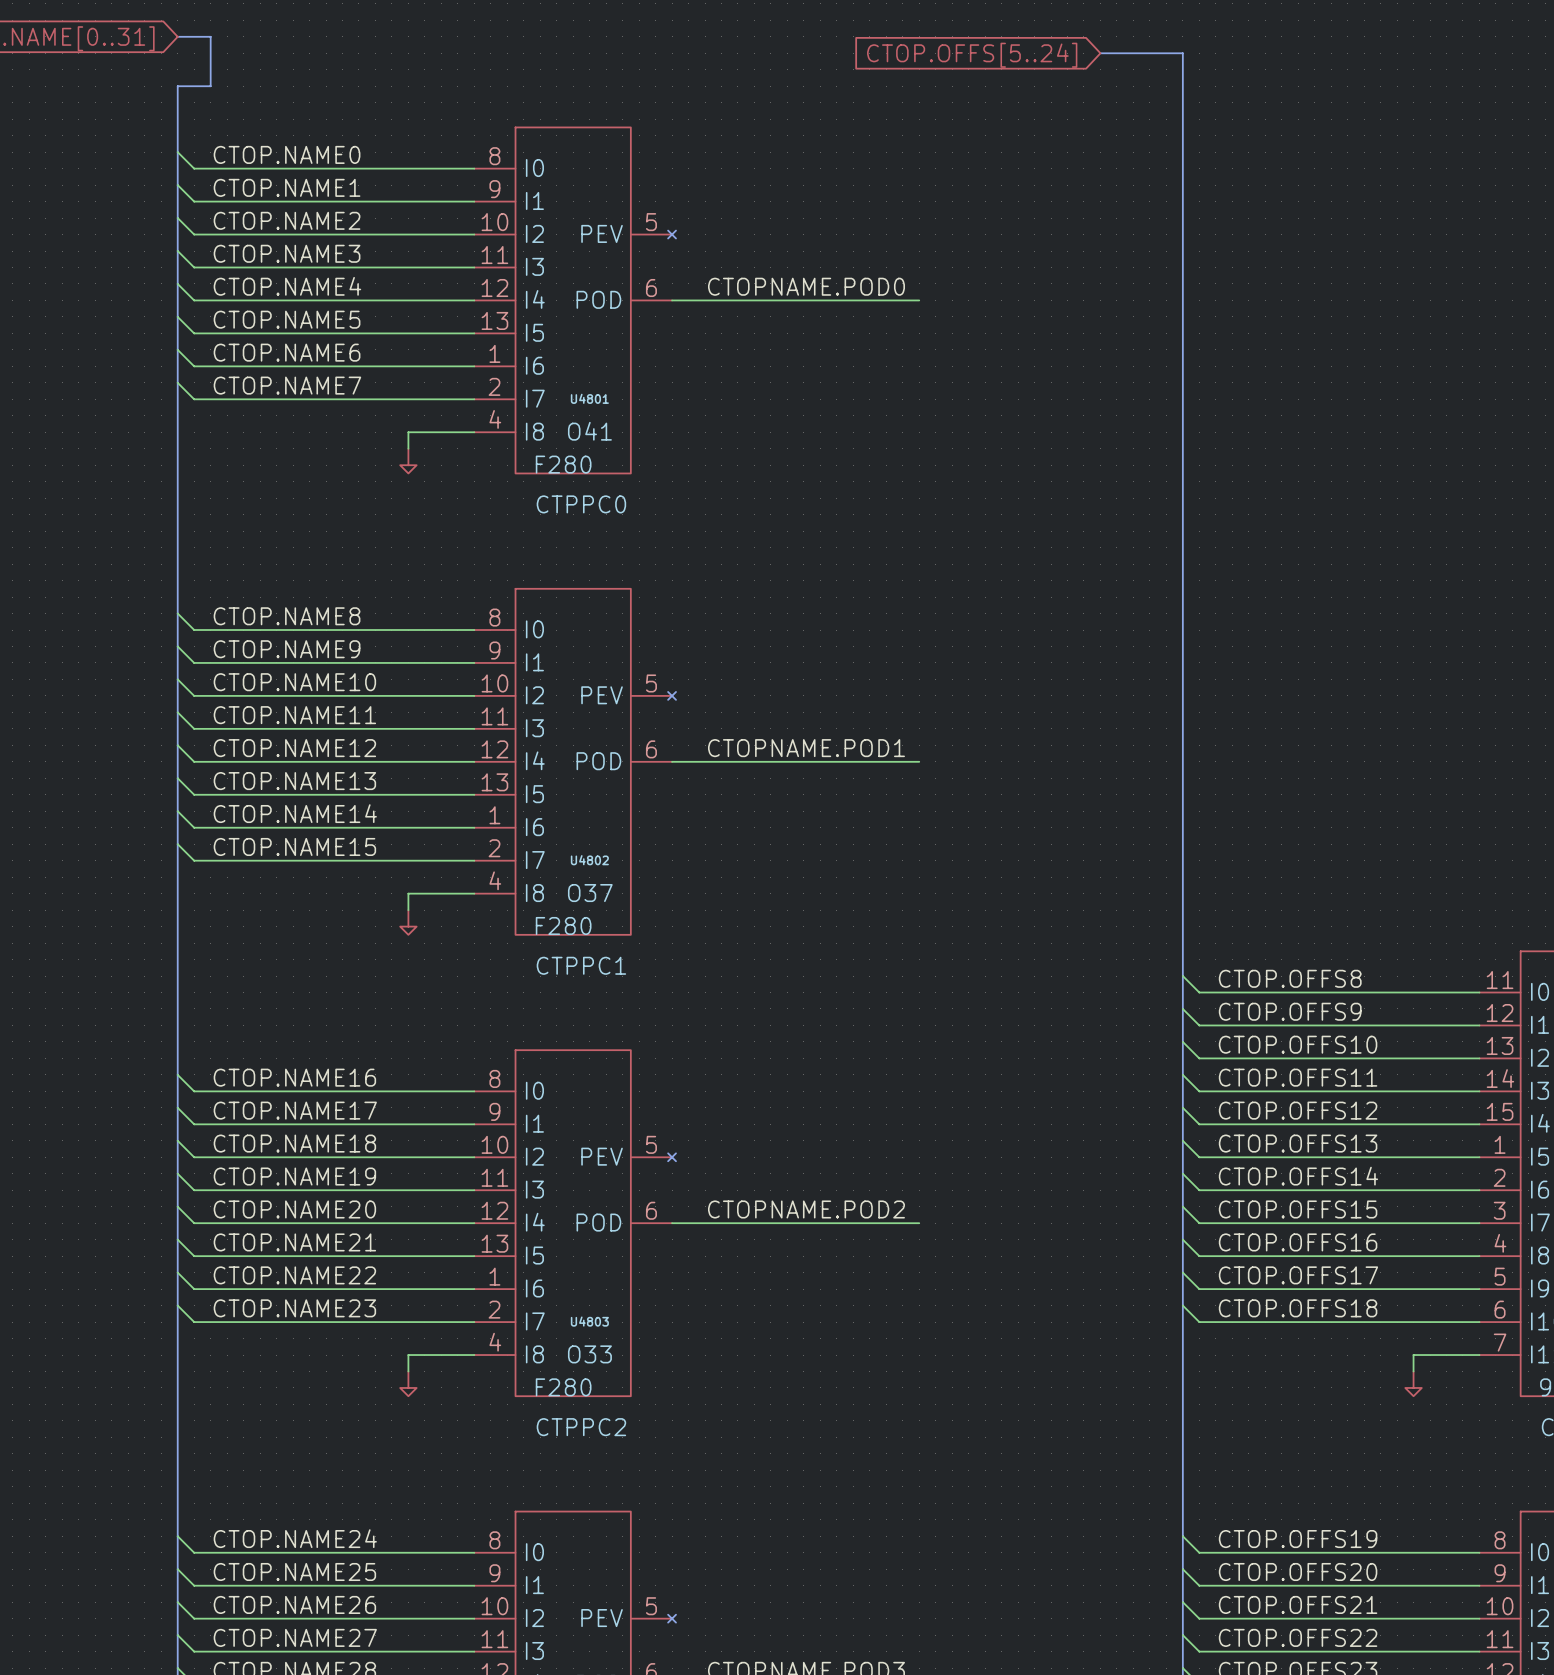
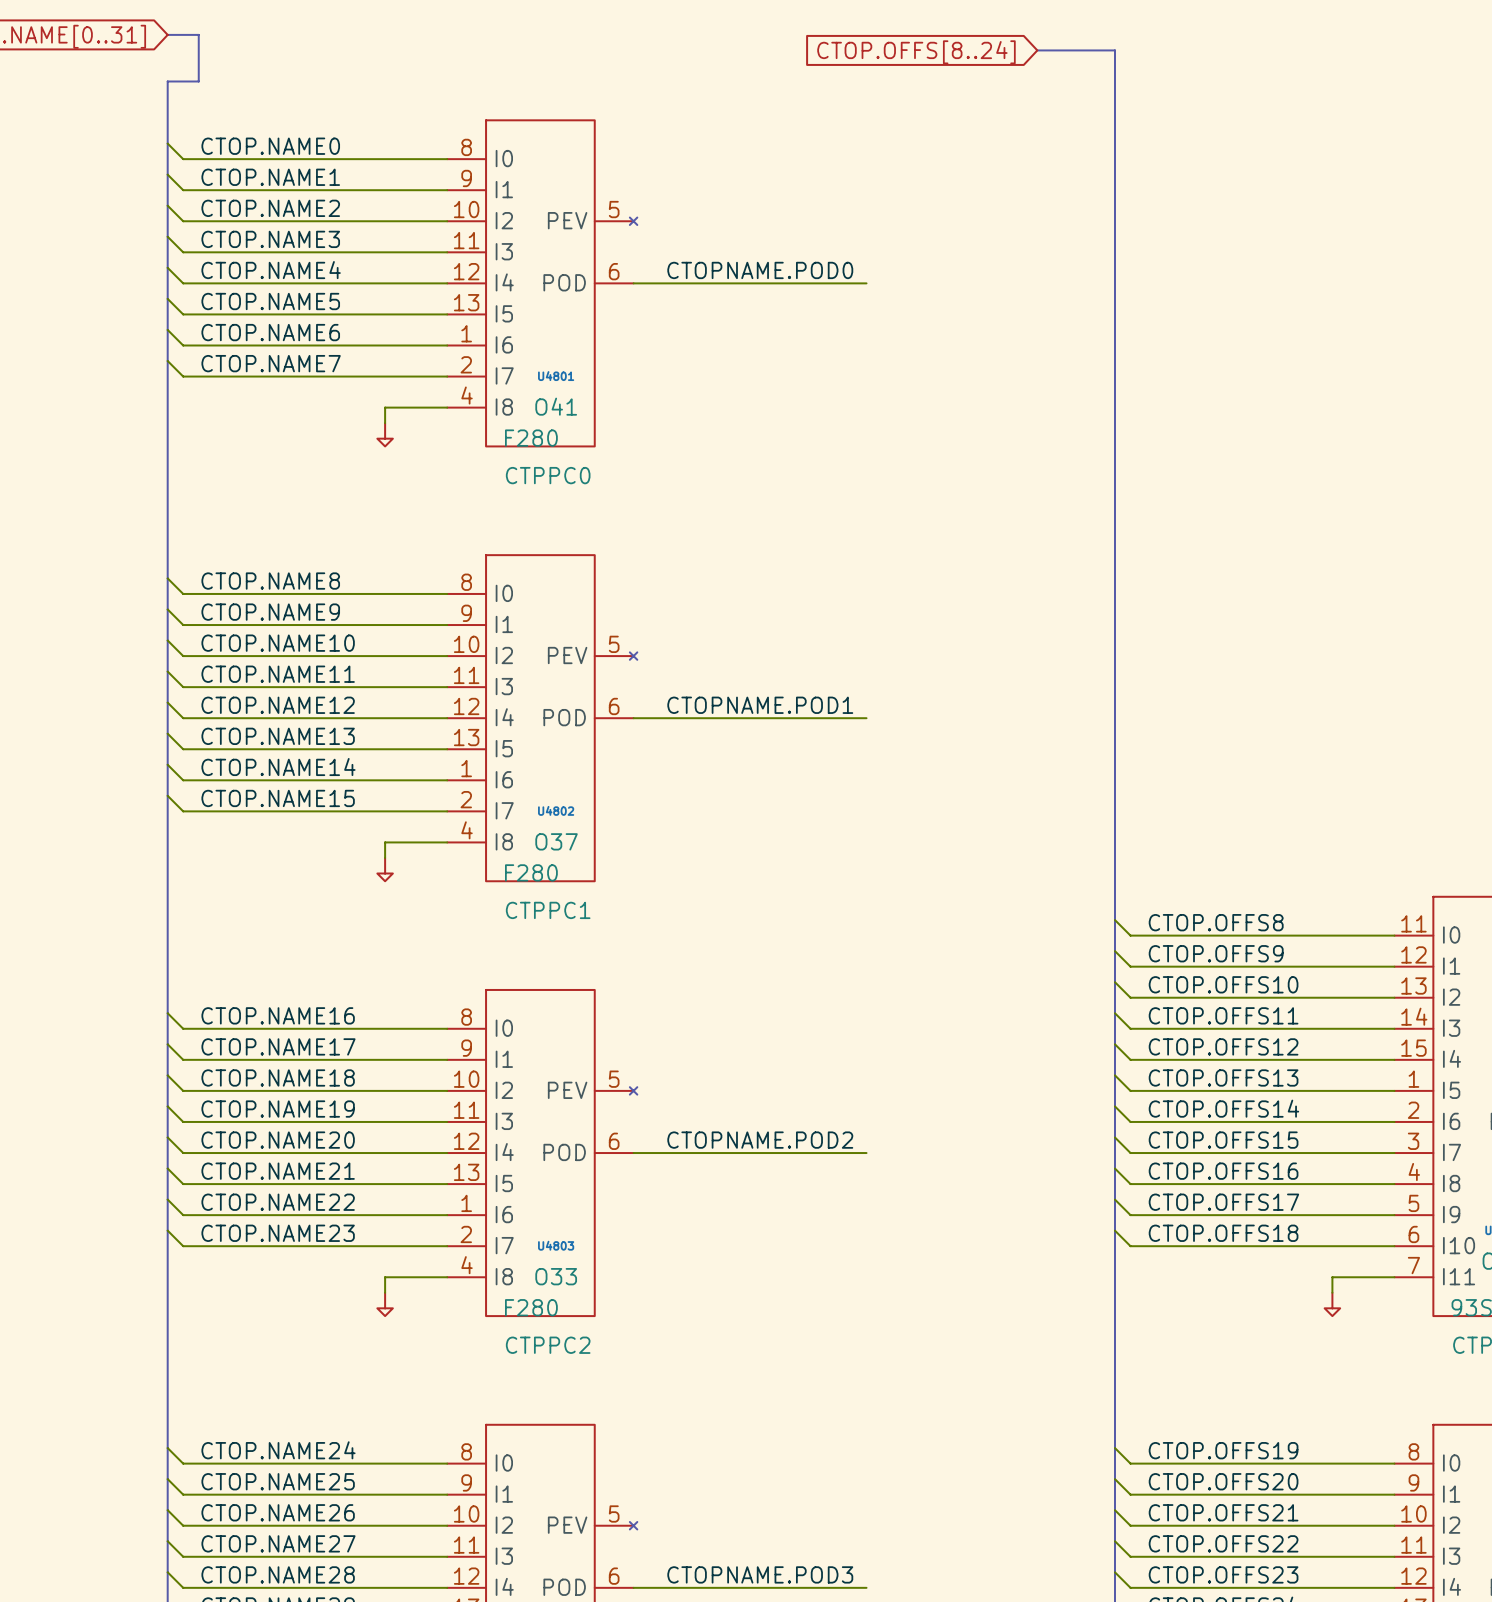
global label: CTOP.OFFS[5..24] (972, 55) -> CTOP.OFFS[8..24] (916, 52)

